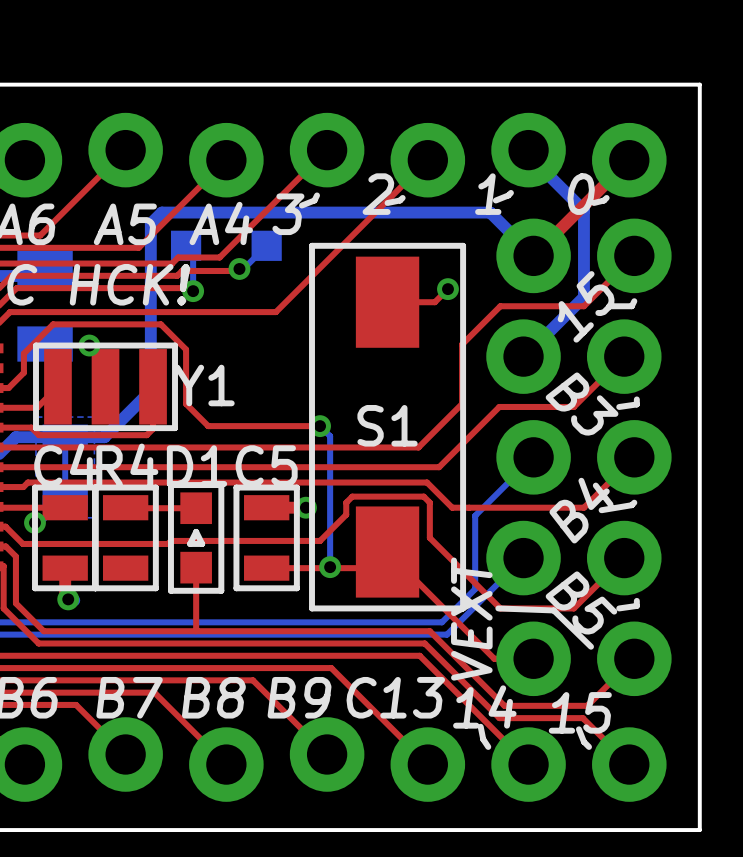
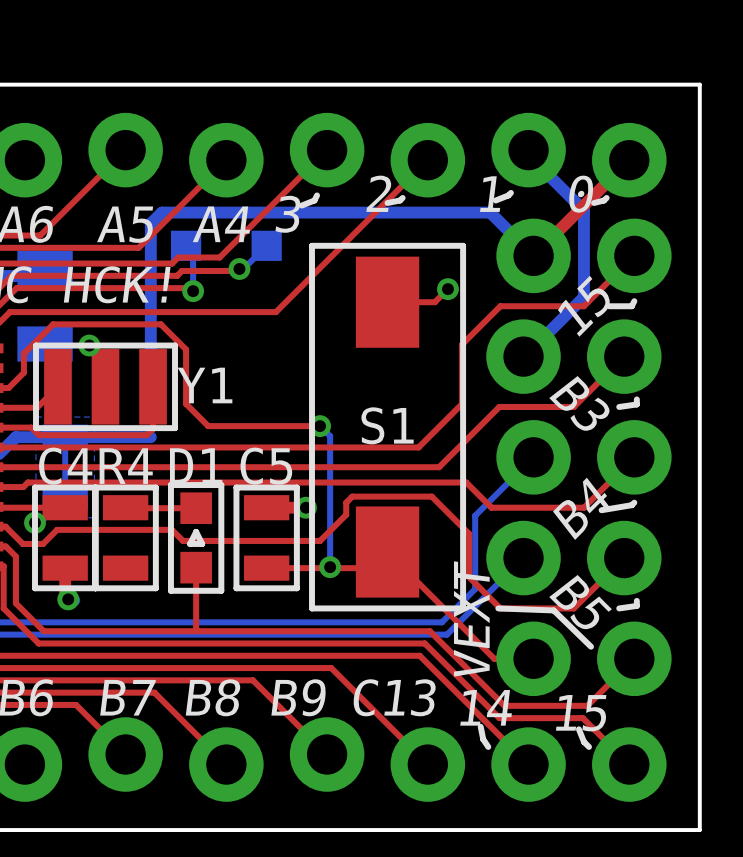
bottom track: (150, 390) (104, 437) -> (150, 437) (104, 437)
top track: (427, 482) (452, 507) (491, 507) -> (427, 482) (466, 482) (491, 507)
top track: (423, 496) (429, 502) (429, 537) (469, 577) -> (423, 496) (431, 496) (469, 533) (469, 577)
top track: (183, 540) (170, 540) (167, 543) (43, 543) -> (183, 540) (171, 529) (57, 529) (43, 543)

